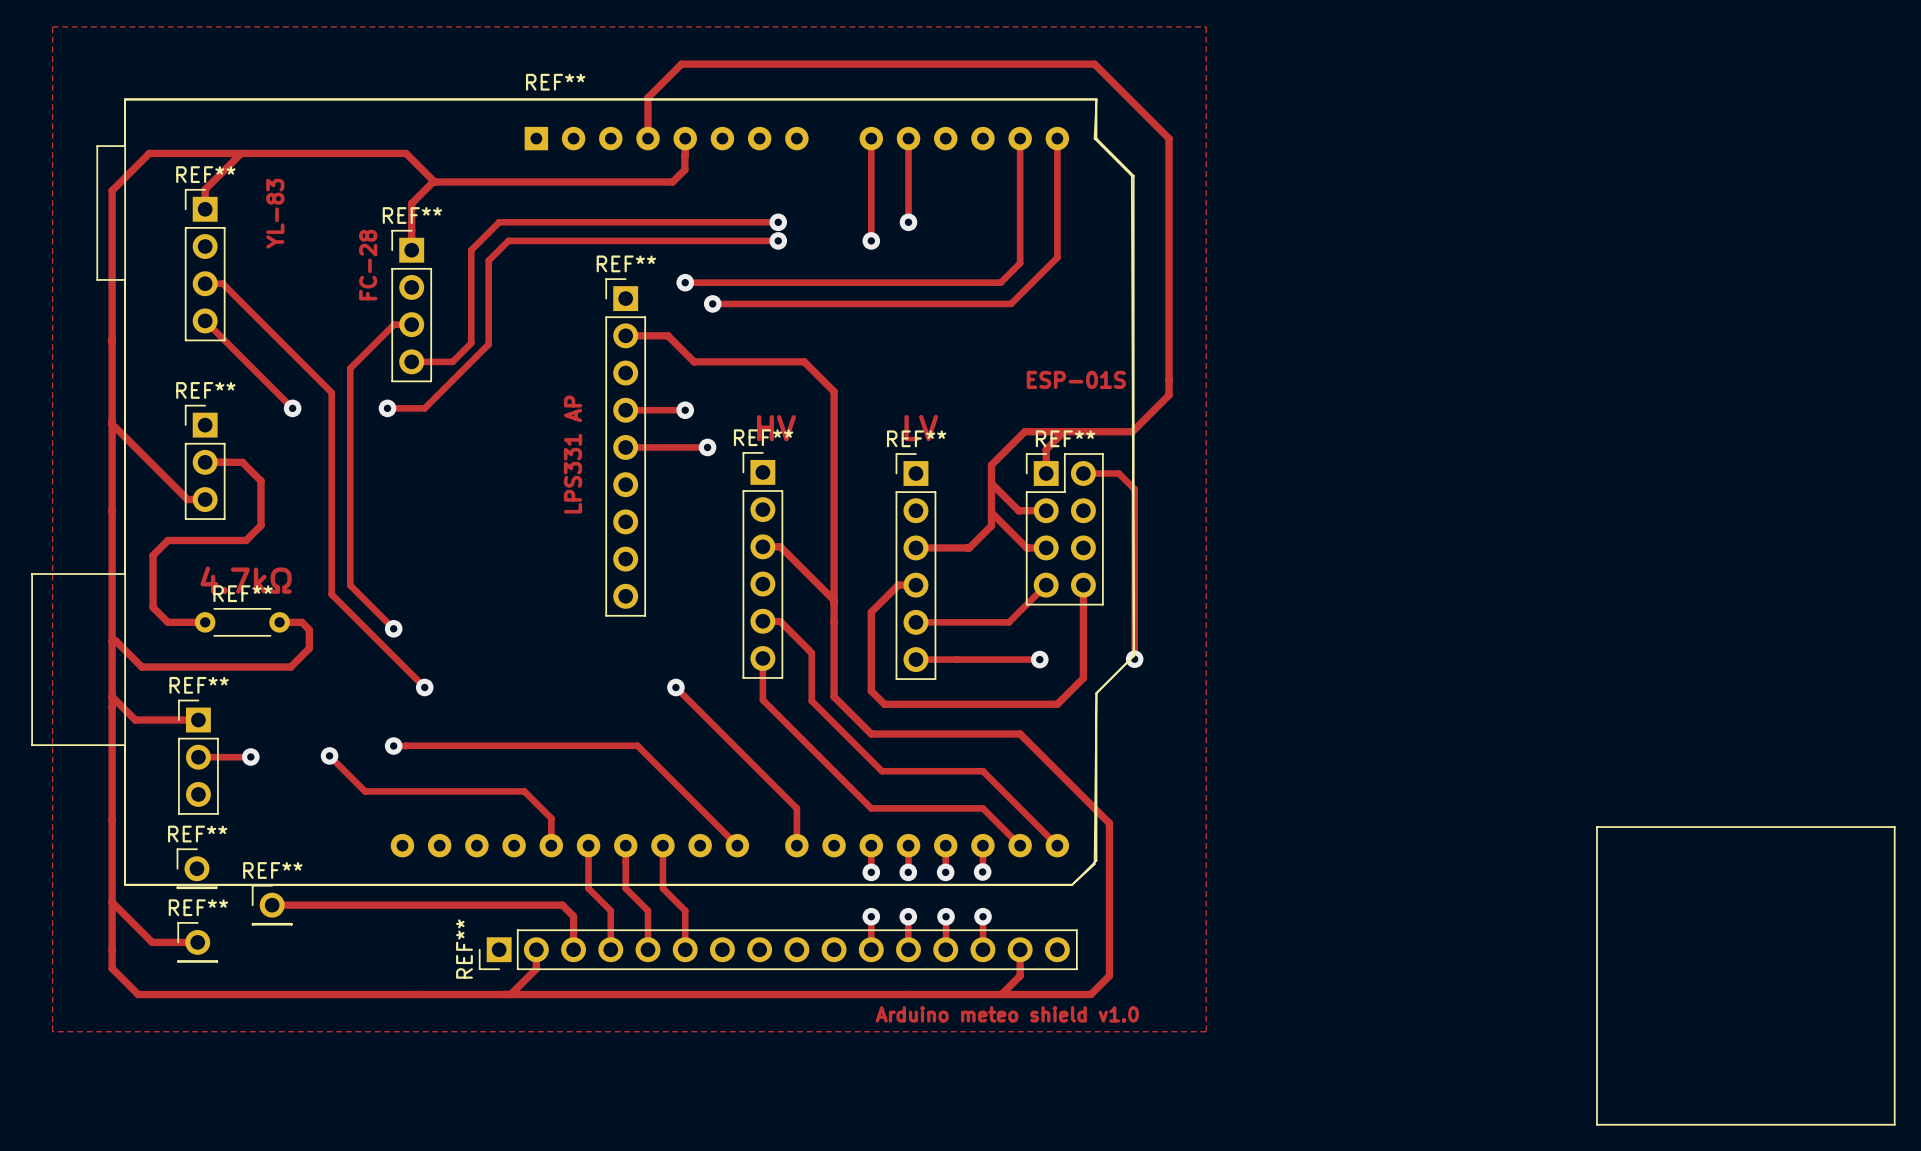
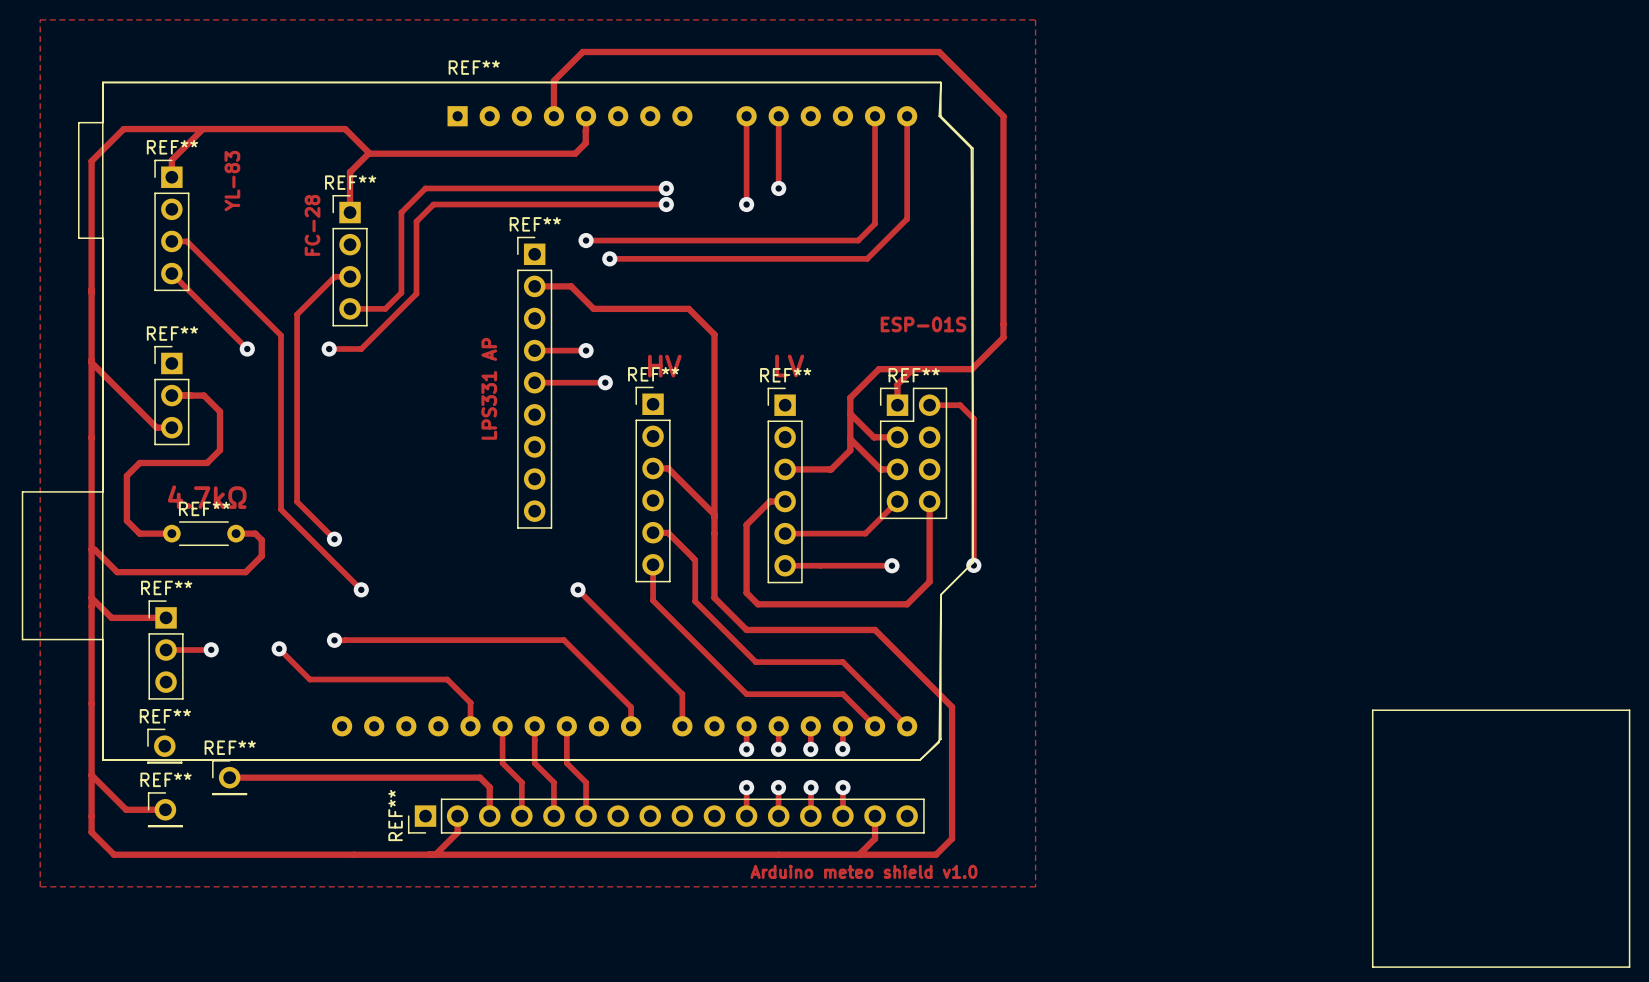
track: (637, 745) (737, 845) -> (544, 640) (563, 640) (631, 707) (631, 726)

